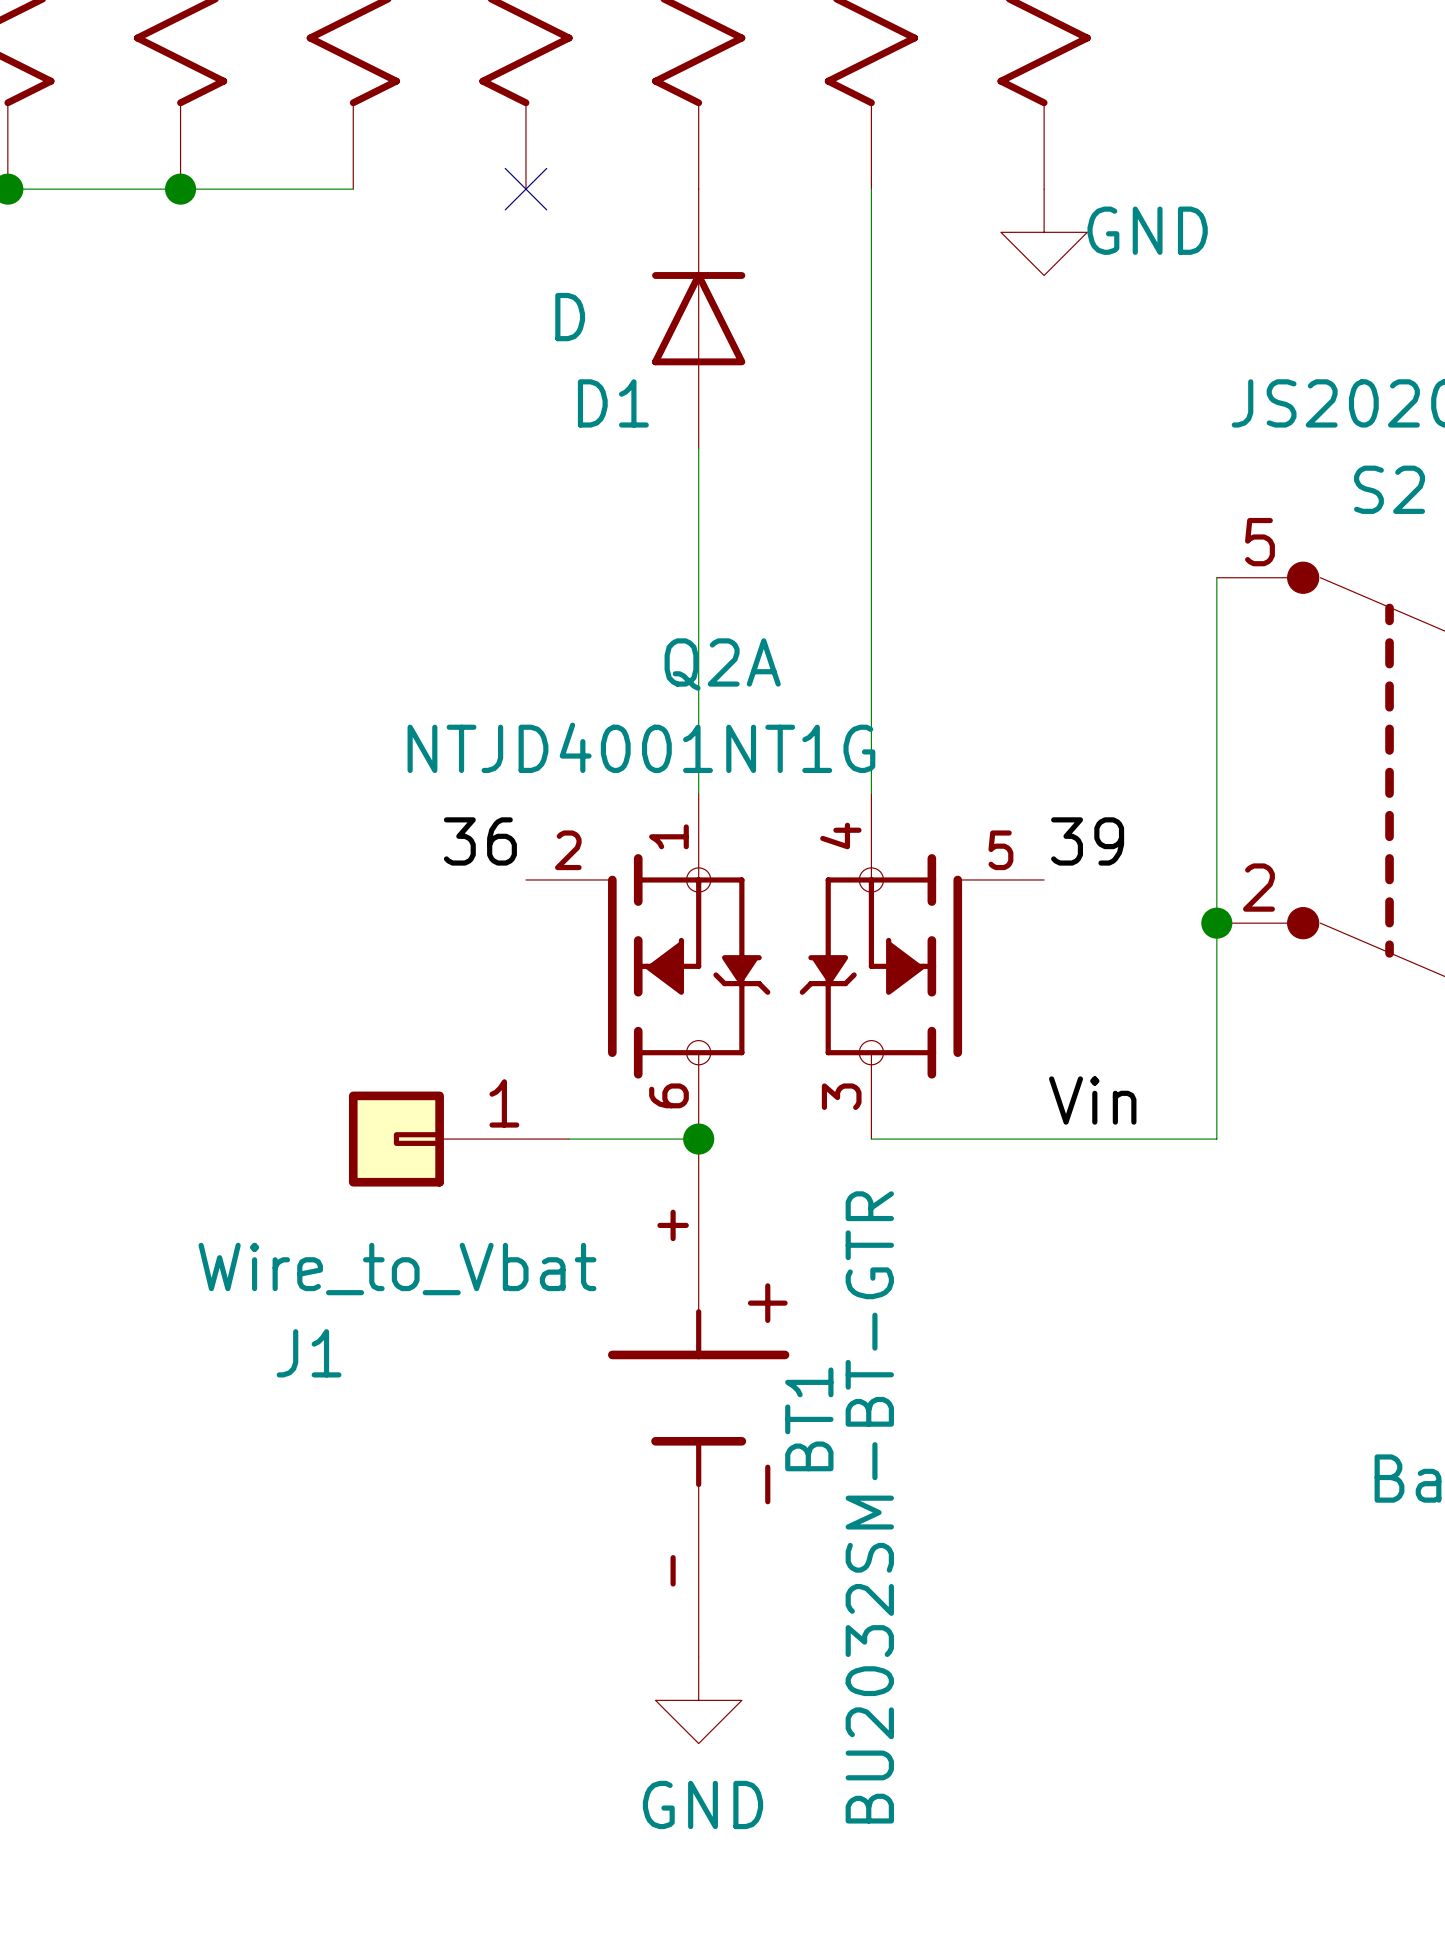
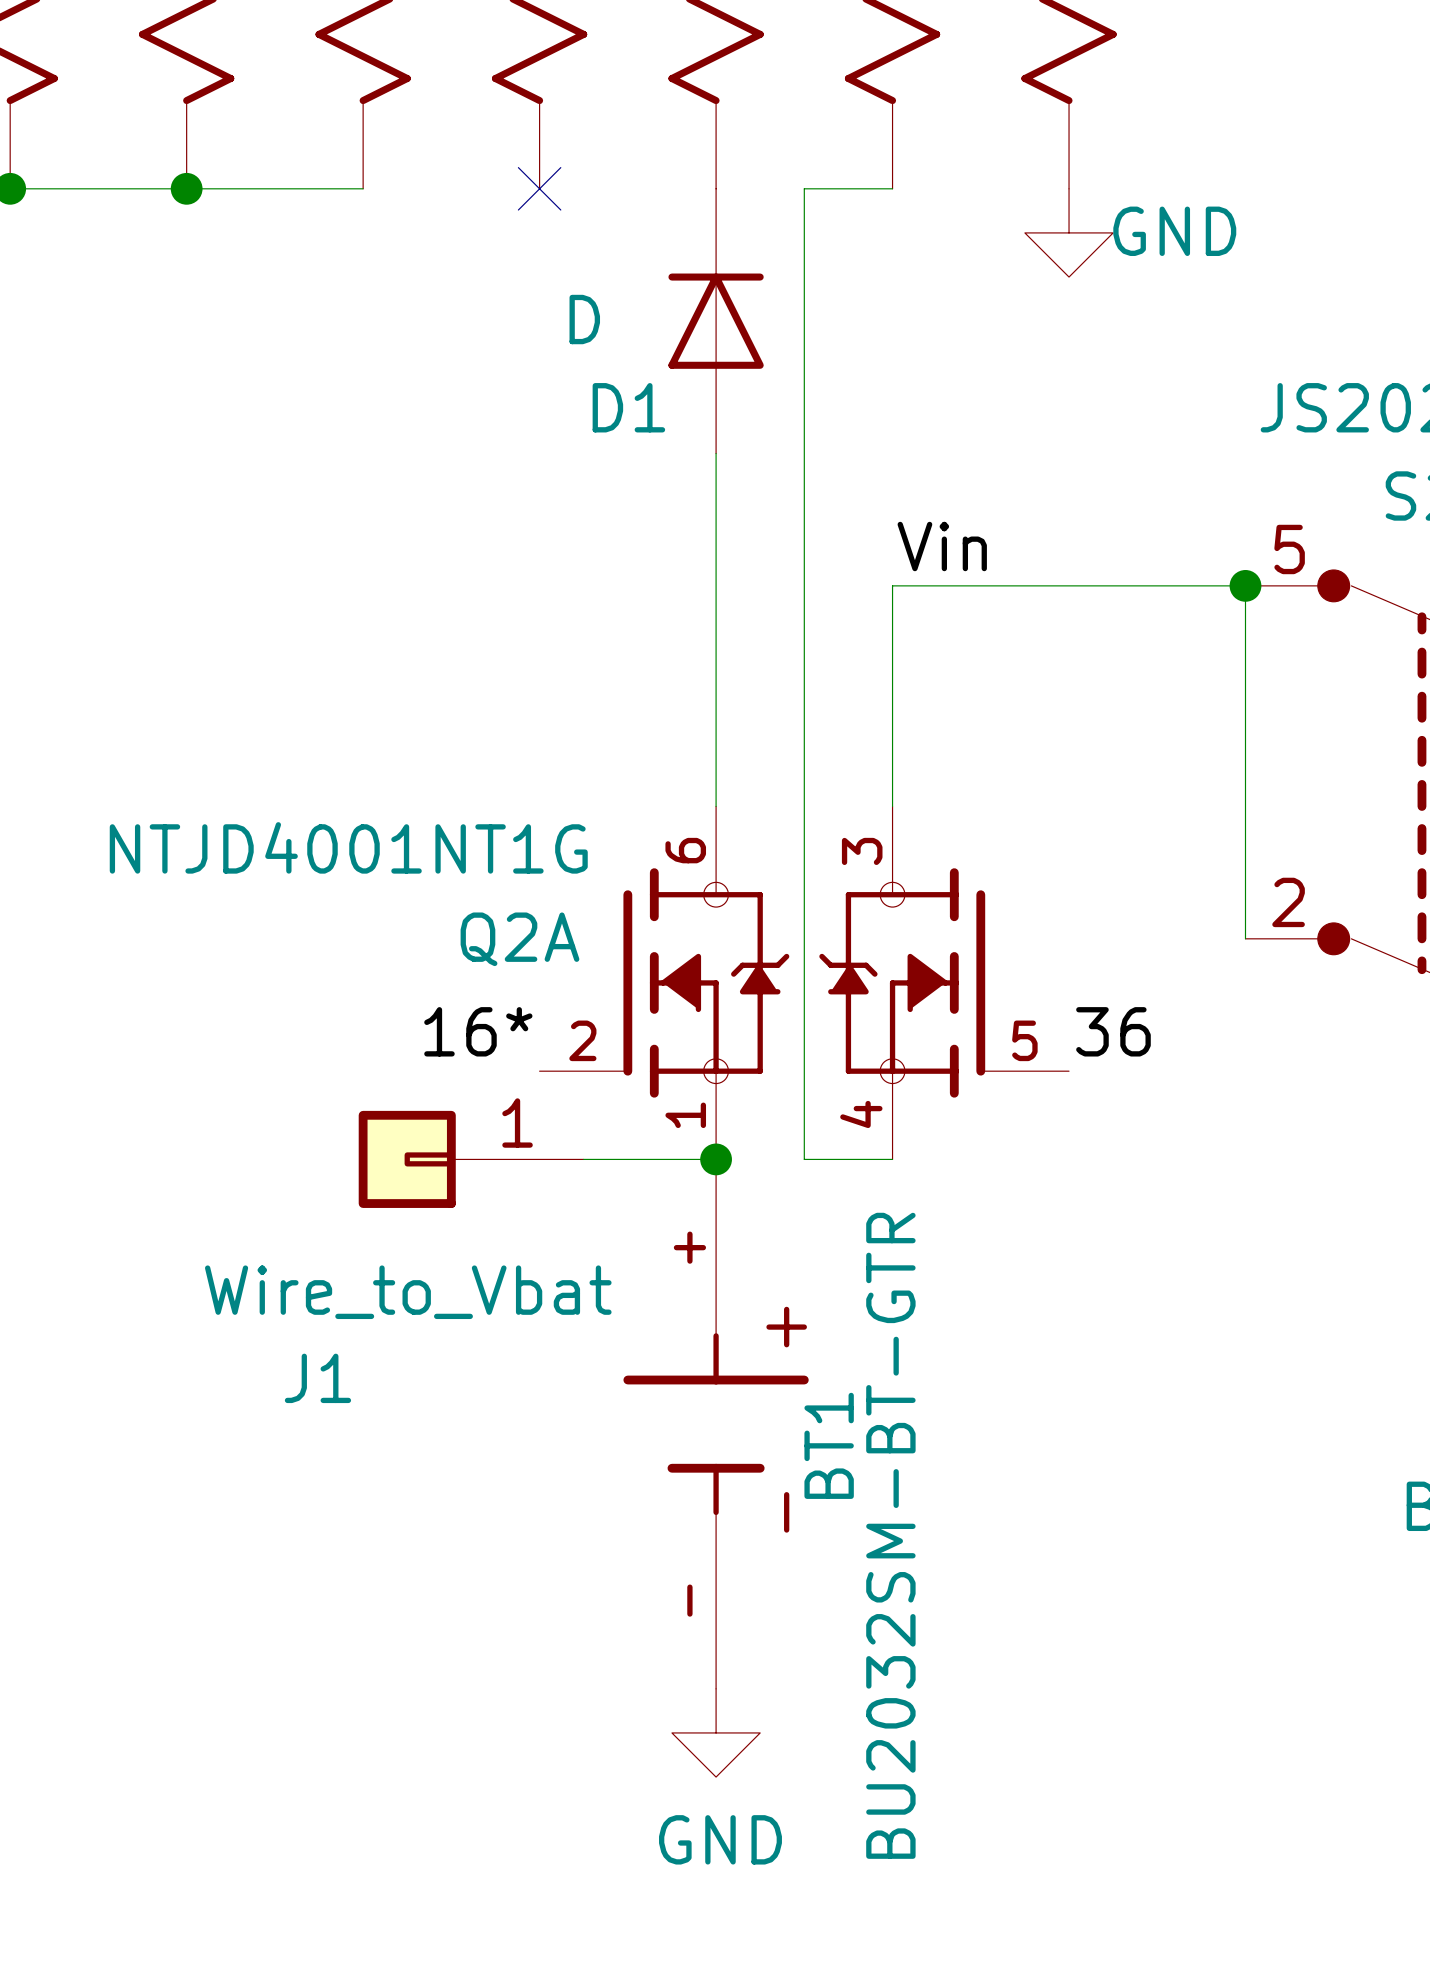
wire: (871, 189) (871, 577) -> (1245, 585) (892, 585)
junction: none -> (1245, 585)
Q2A name position: Q2A (722, 664) -> Q2A (519, 939)
Q2A value position: NTJD4001NT1G (641, 747) -> NTJD4001NT1G (348, 847)
label position: 36 (480, 841) -> 36 (1113, 1031)
label: 39 (1087, 841) -> none
wire: (1216, 923) (1216, 1139) (871, 1139) -> (892, 188) (804, 188) (804, 1159) (892, 1159)
junction: (1216, 923) -> none
Q2A flip: as is (785, 966) -> up-down (804, 982)
label: none -> 16* (478, 1031)
label position: Vin (1092, 1100) -> Vin (942, 546)

